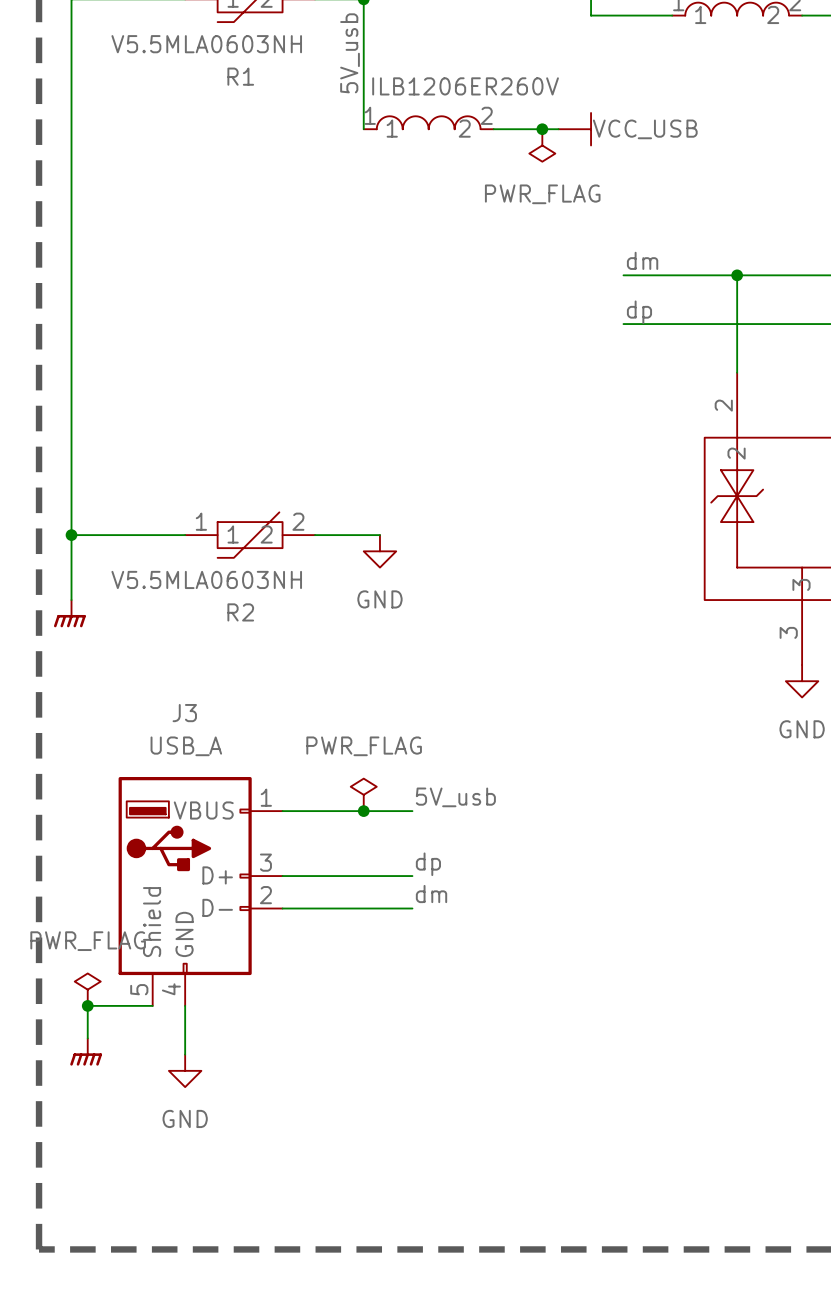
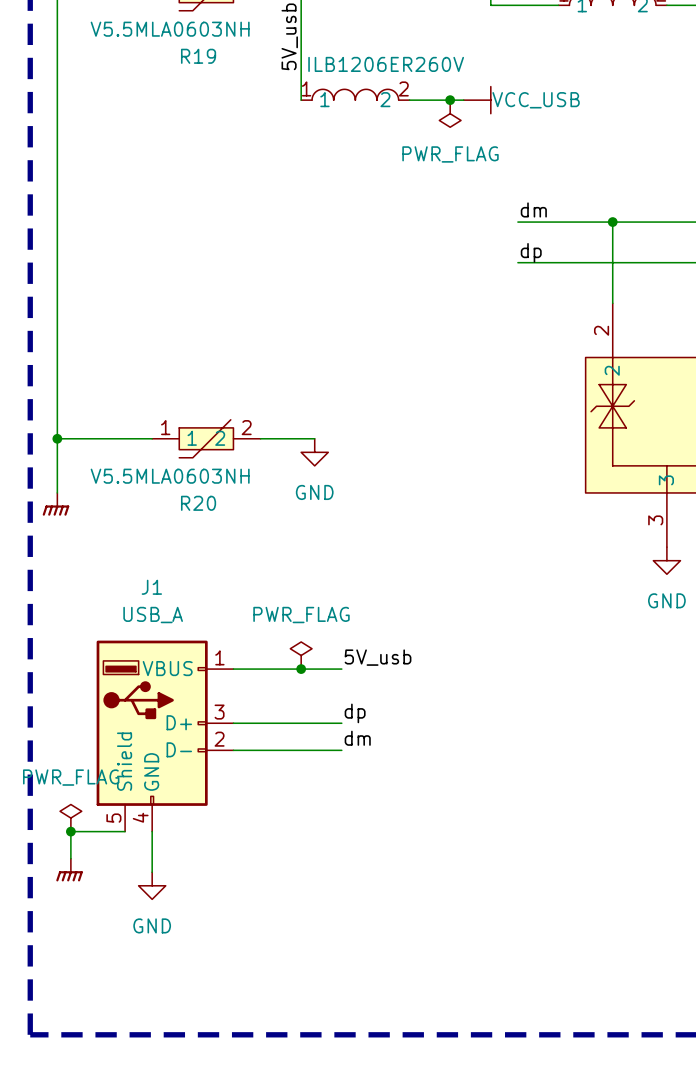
R1 name: R1 (240, 76) -> R19 (198, 56)
R2 name: R2 (240, 612) -> R20 (198, 503)
J3 name: J3 (184, 713) -> J1 (151, 587)

